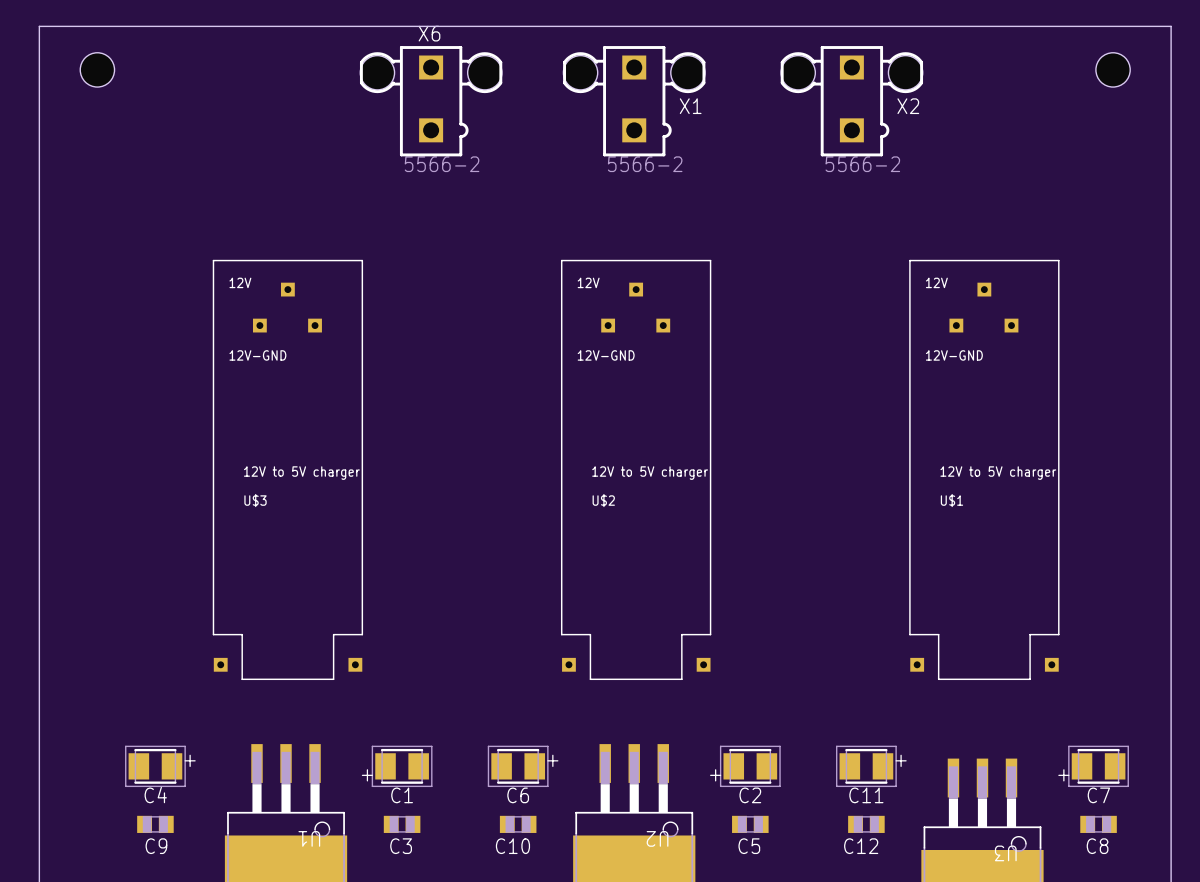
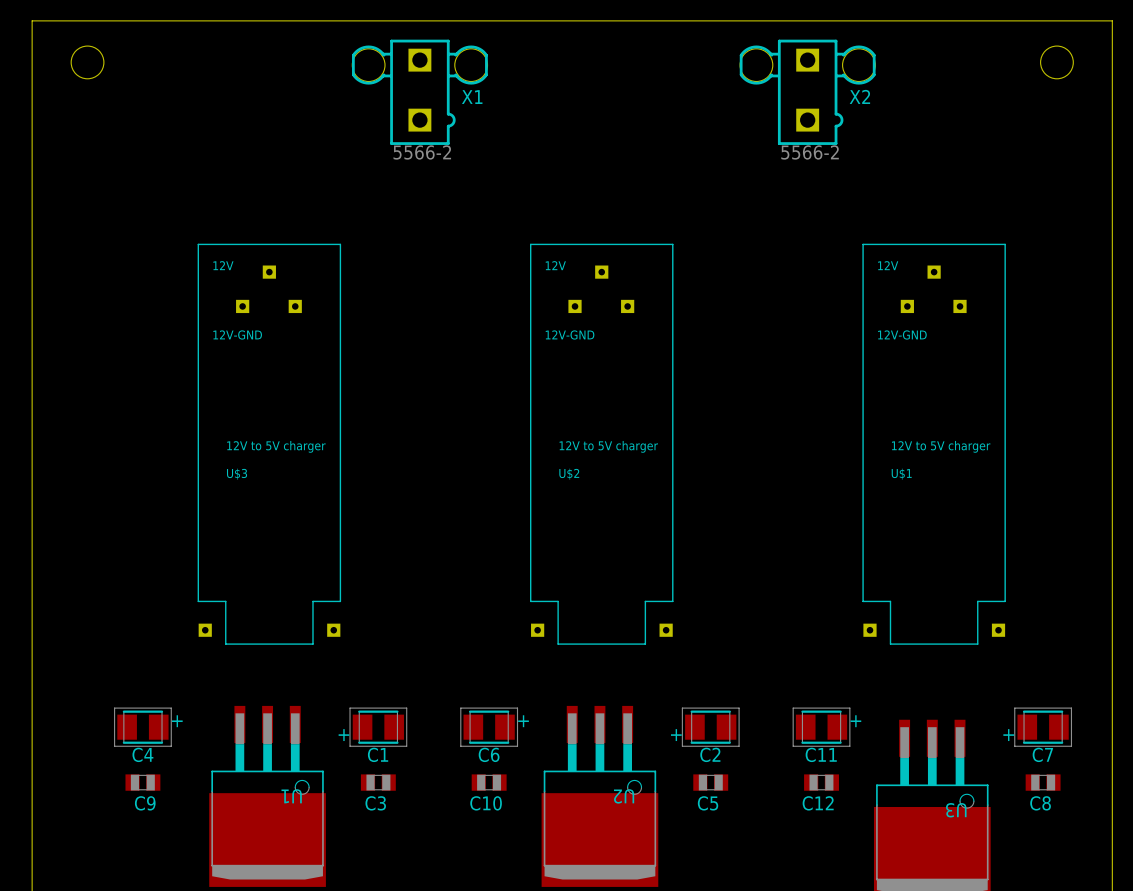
X6: 5566-2 (431, 101) -> none
X1 position: (634, 101) -> (419, 92)

